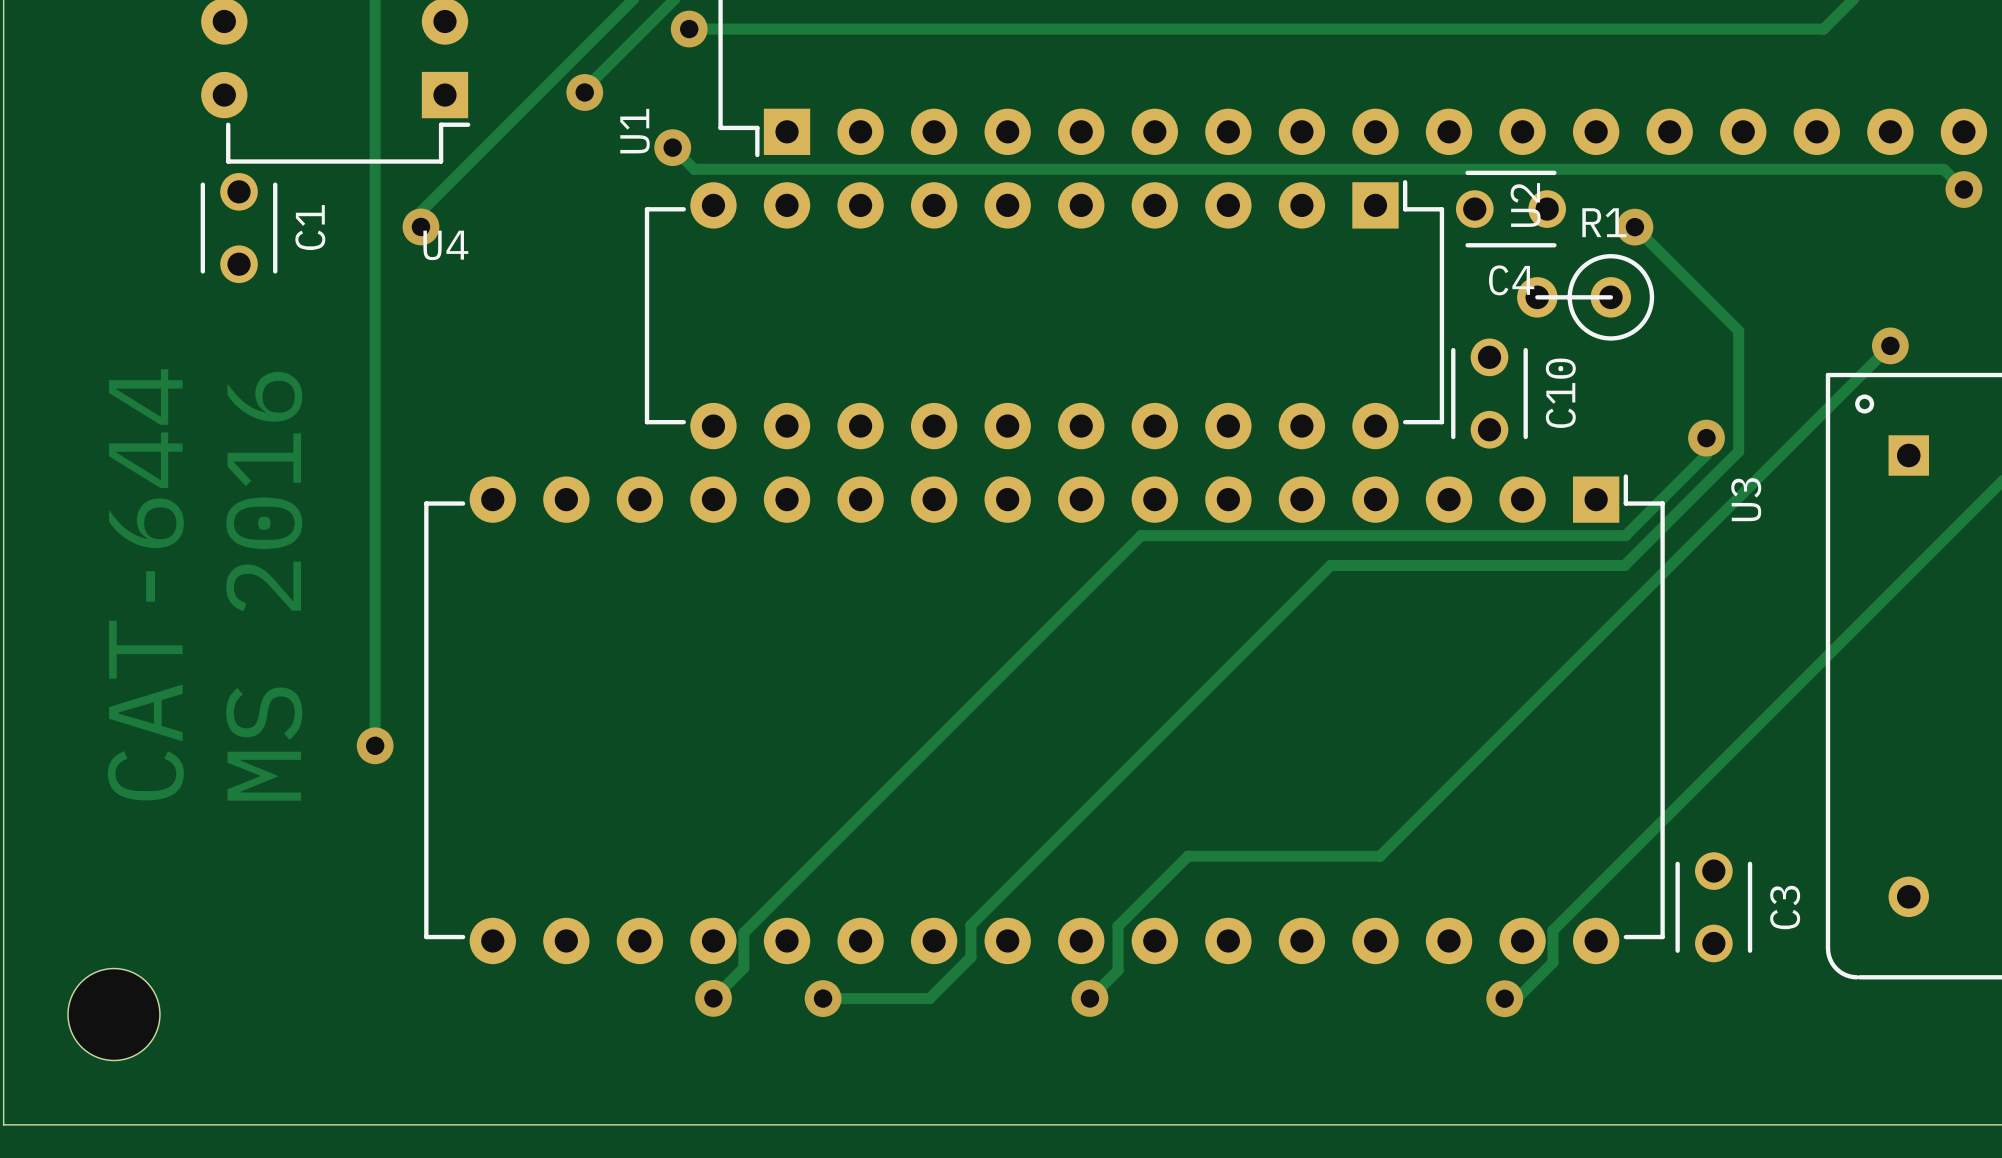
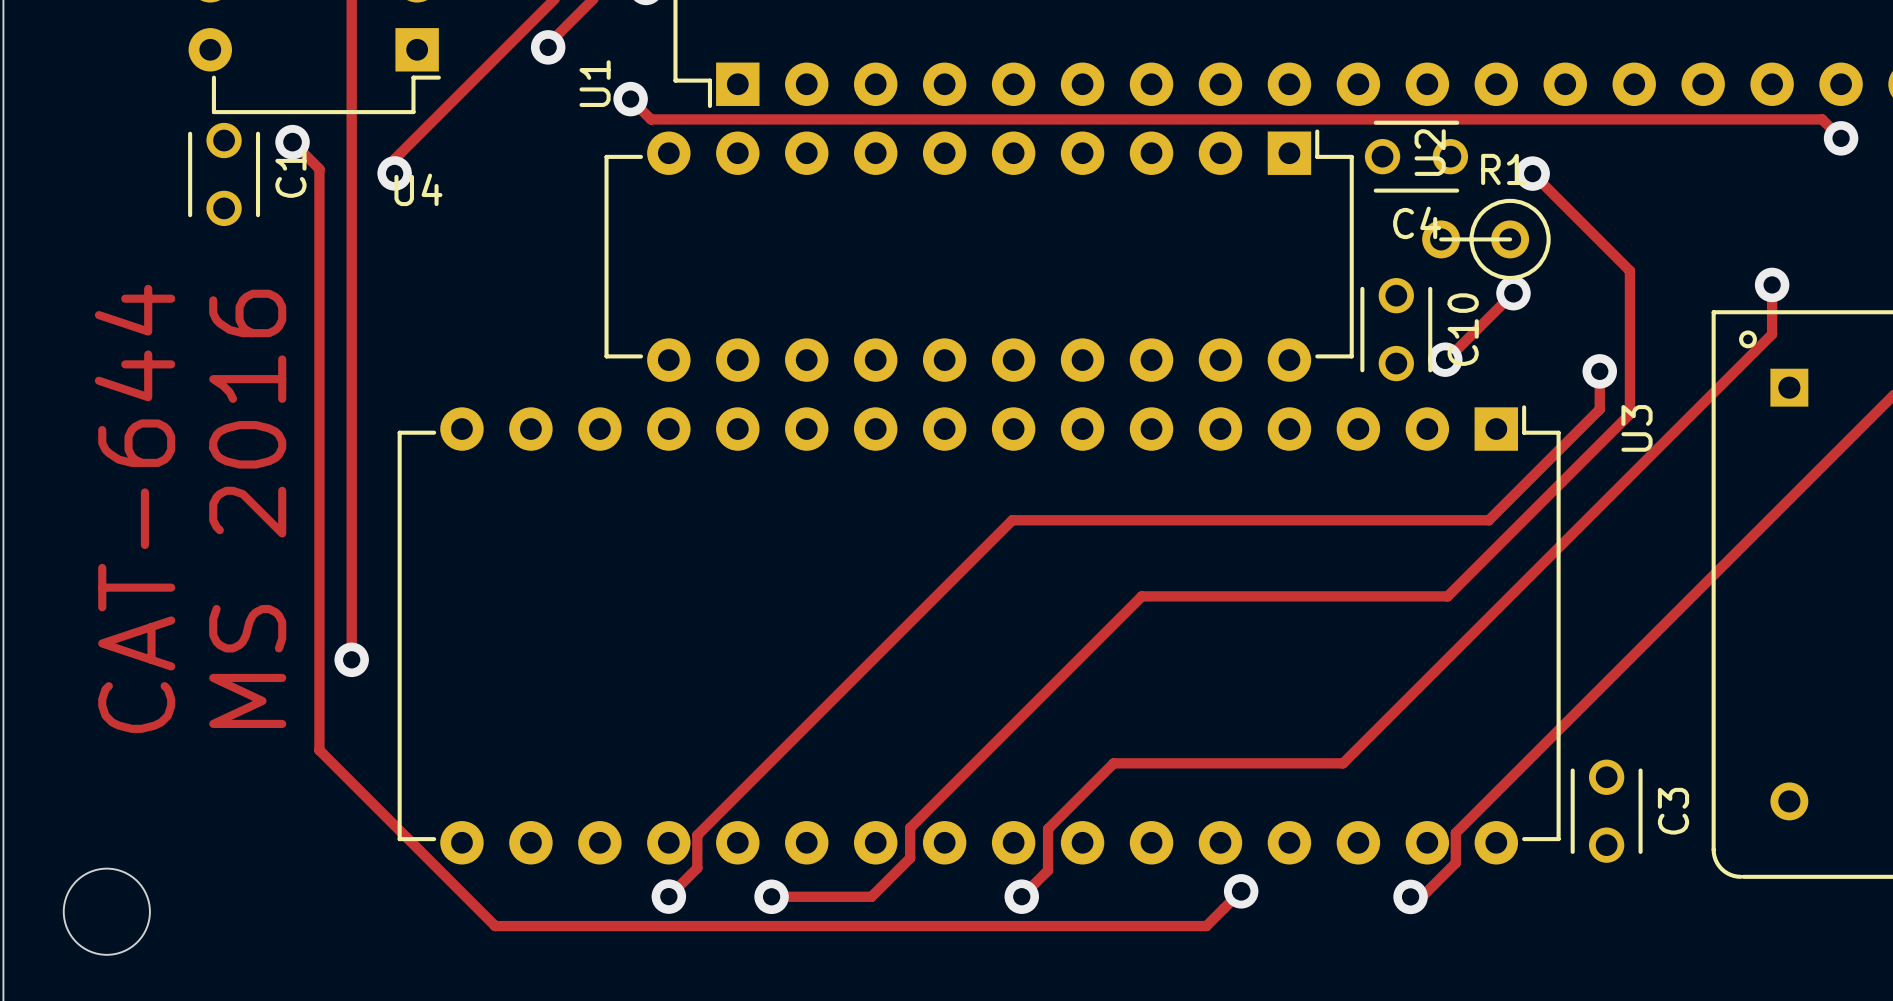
track: none -> (292, 142) (319, 169) (319, 750) (495, 926) (1206, 926) (1241, 891)
via: none -> (292, 142)
track: (1890, 345) (1380, 856) -> (1772, 284) (1772, 334) (1343, 763) (1293, 763)
track: none -> (1513, 293) (1445, 359)
via: none -> (1513, 293)
via: none -> (1445, 359)
track: (1738, 451) (1624, 565) (1330, 565) (1217, 678) -> (1629, 383) (1629, 414) (1447, 596) (1141, 596)
track: (1706, 454) (1625, 535) (1141, 535) (1079, 596) -> (1599, 386) (1599, 409) (1488, 520) (1012, 520)
via: none -> (1241, 891)

